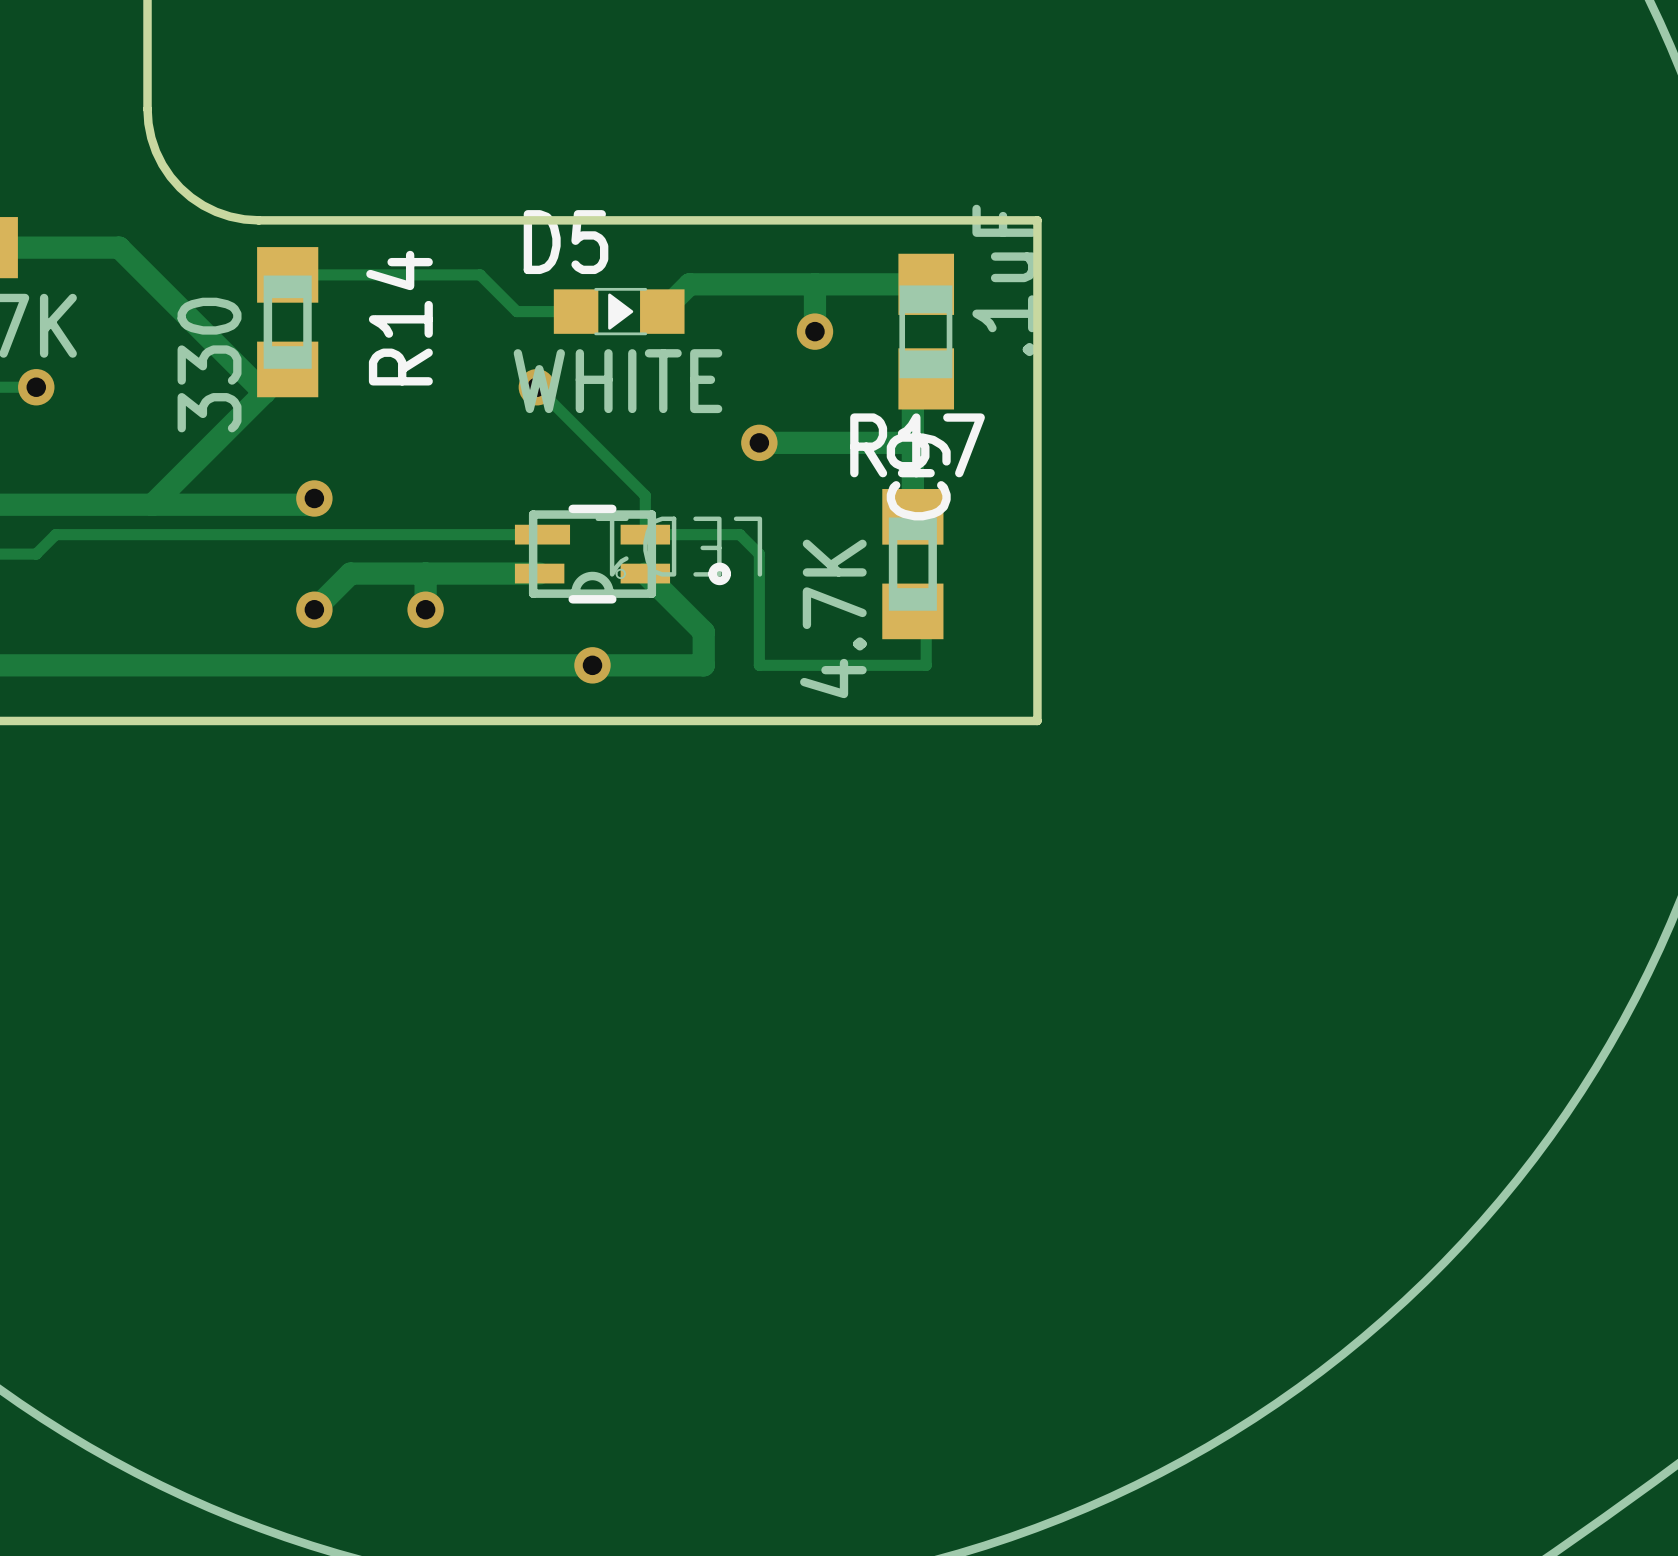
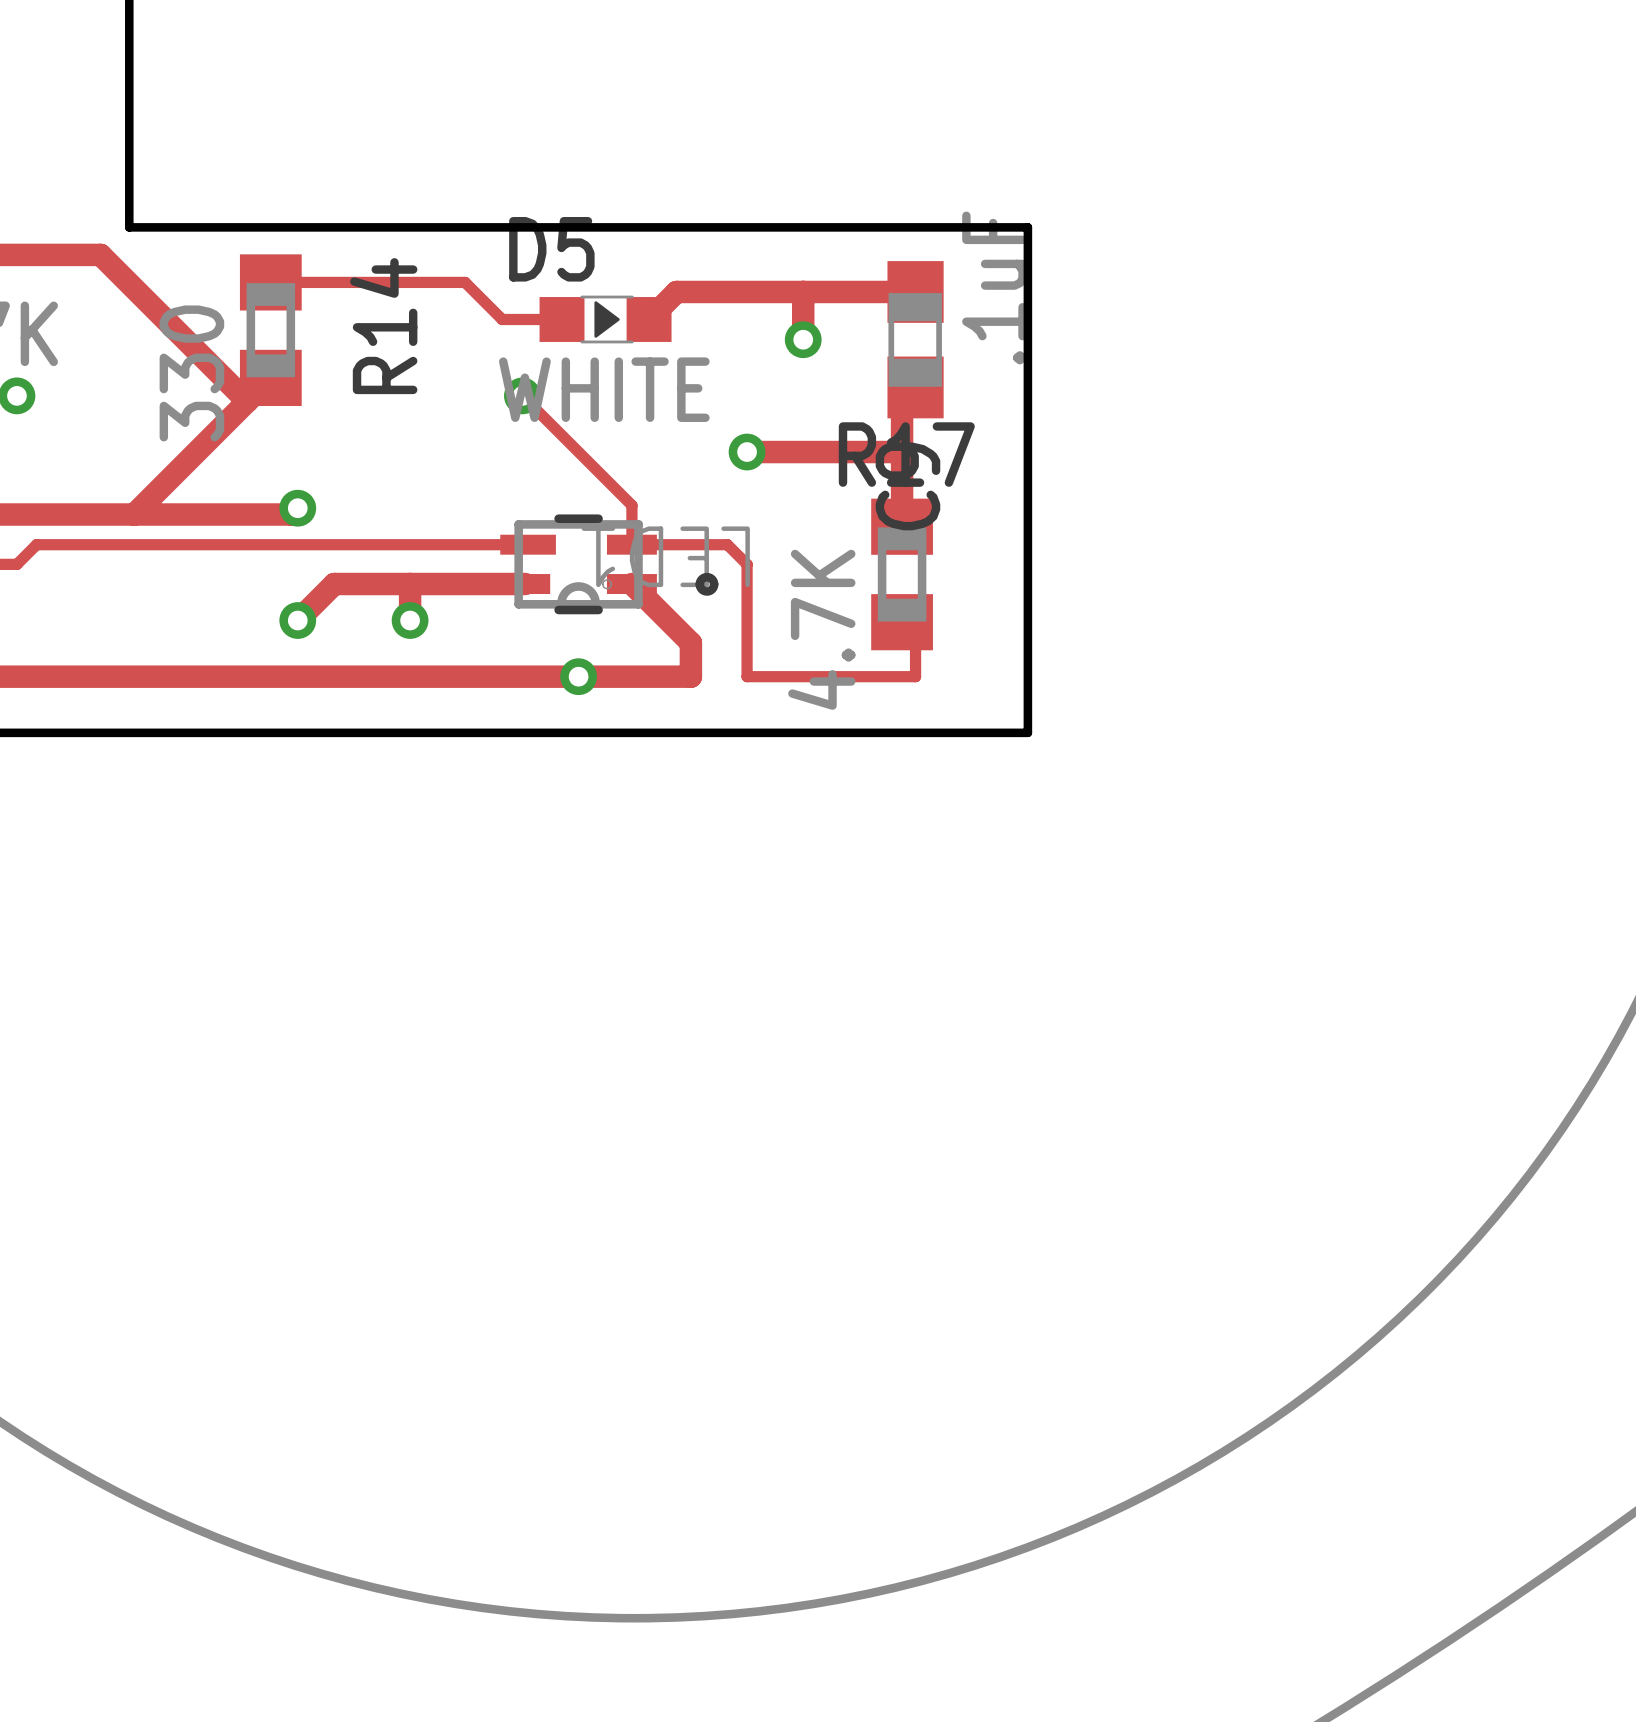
board edge: (147, 109) (151, 137) (155, 151) (162, 164) (180, 187) (203, 205) (216, 211) (229, 216) (258, 220) -> (129, 115) (129, 227) (241, 227)

